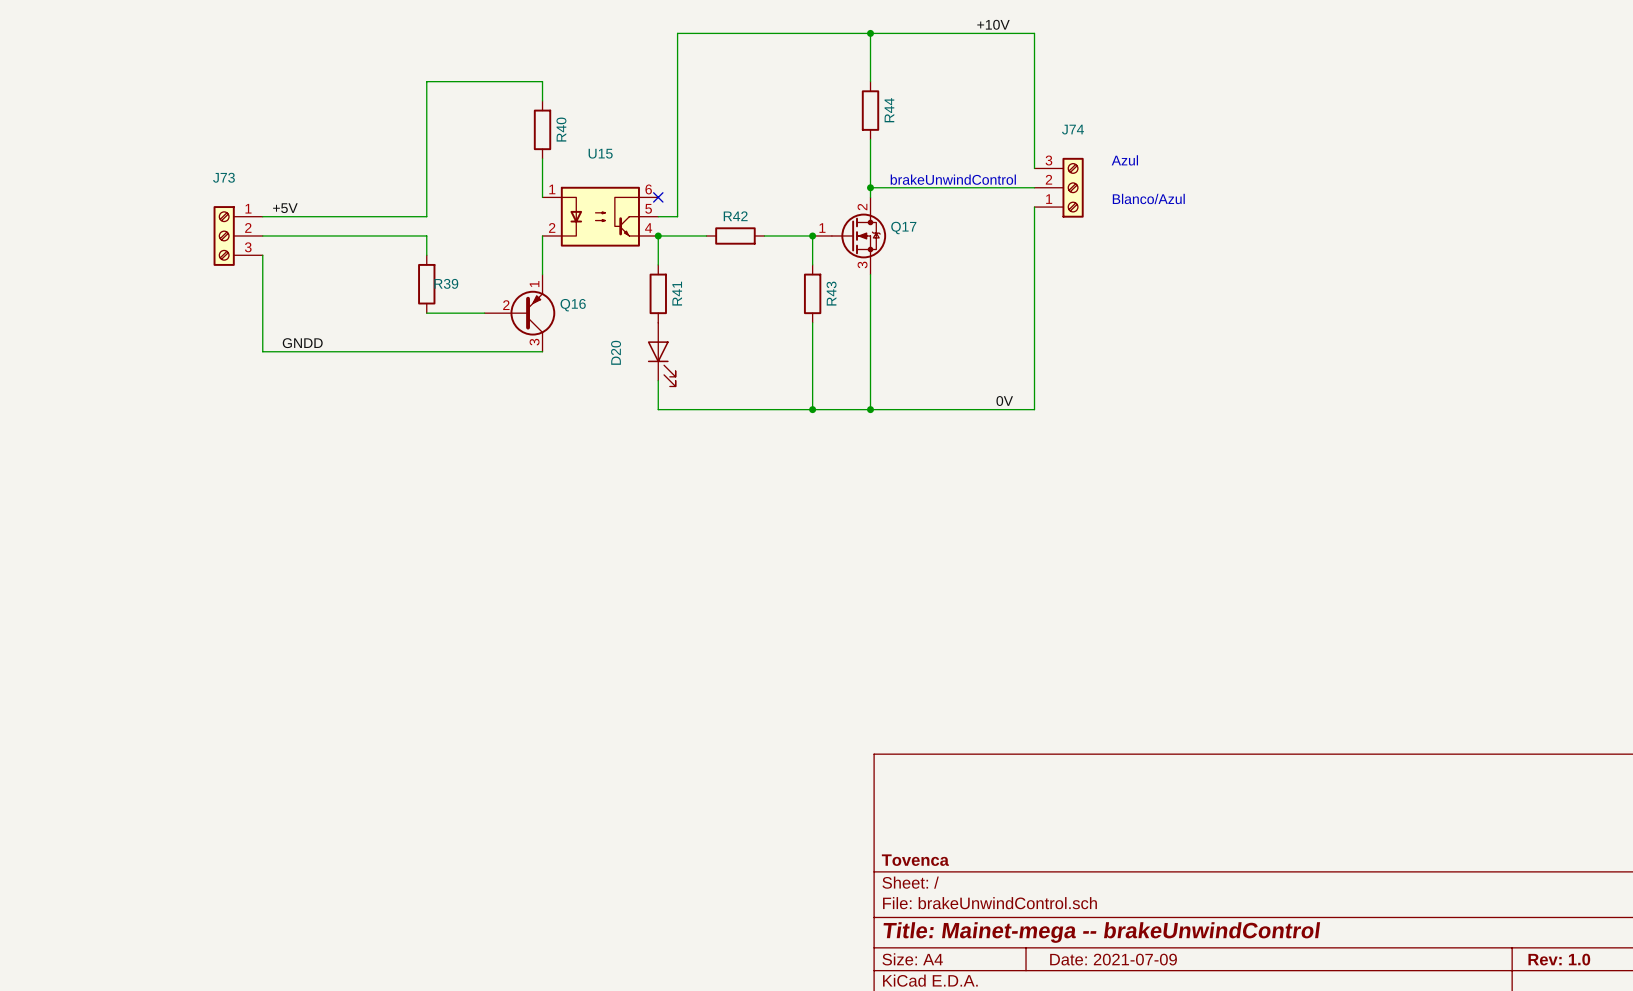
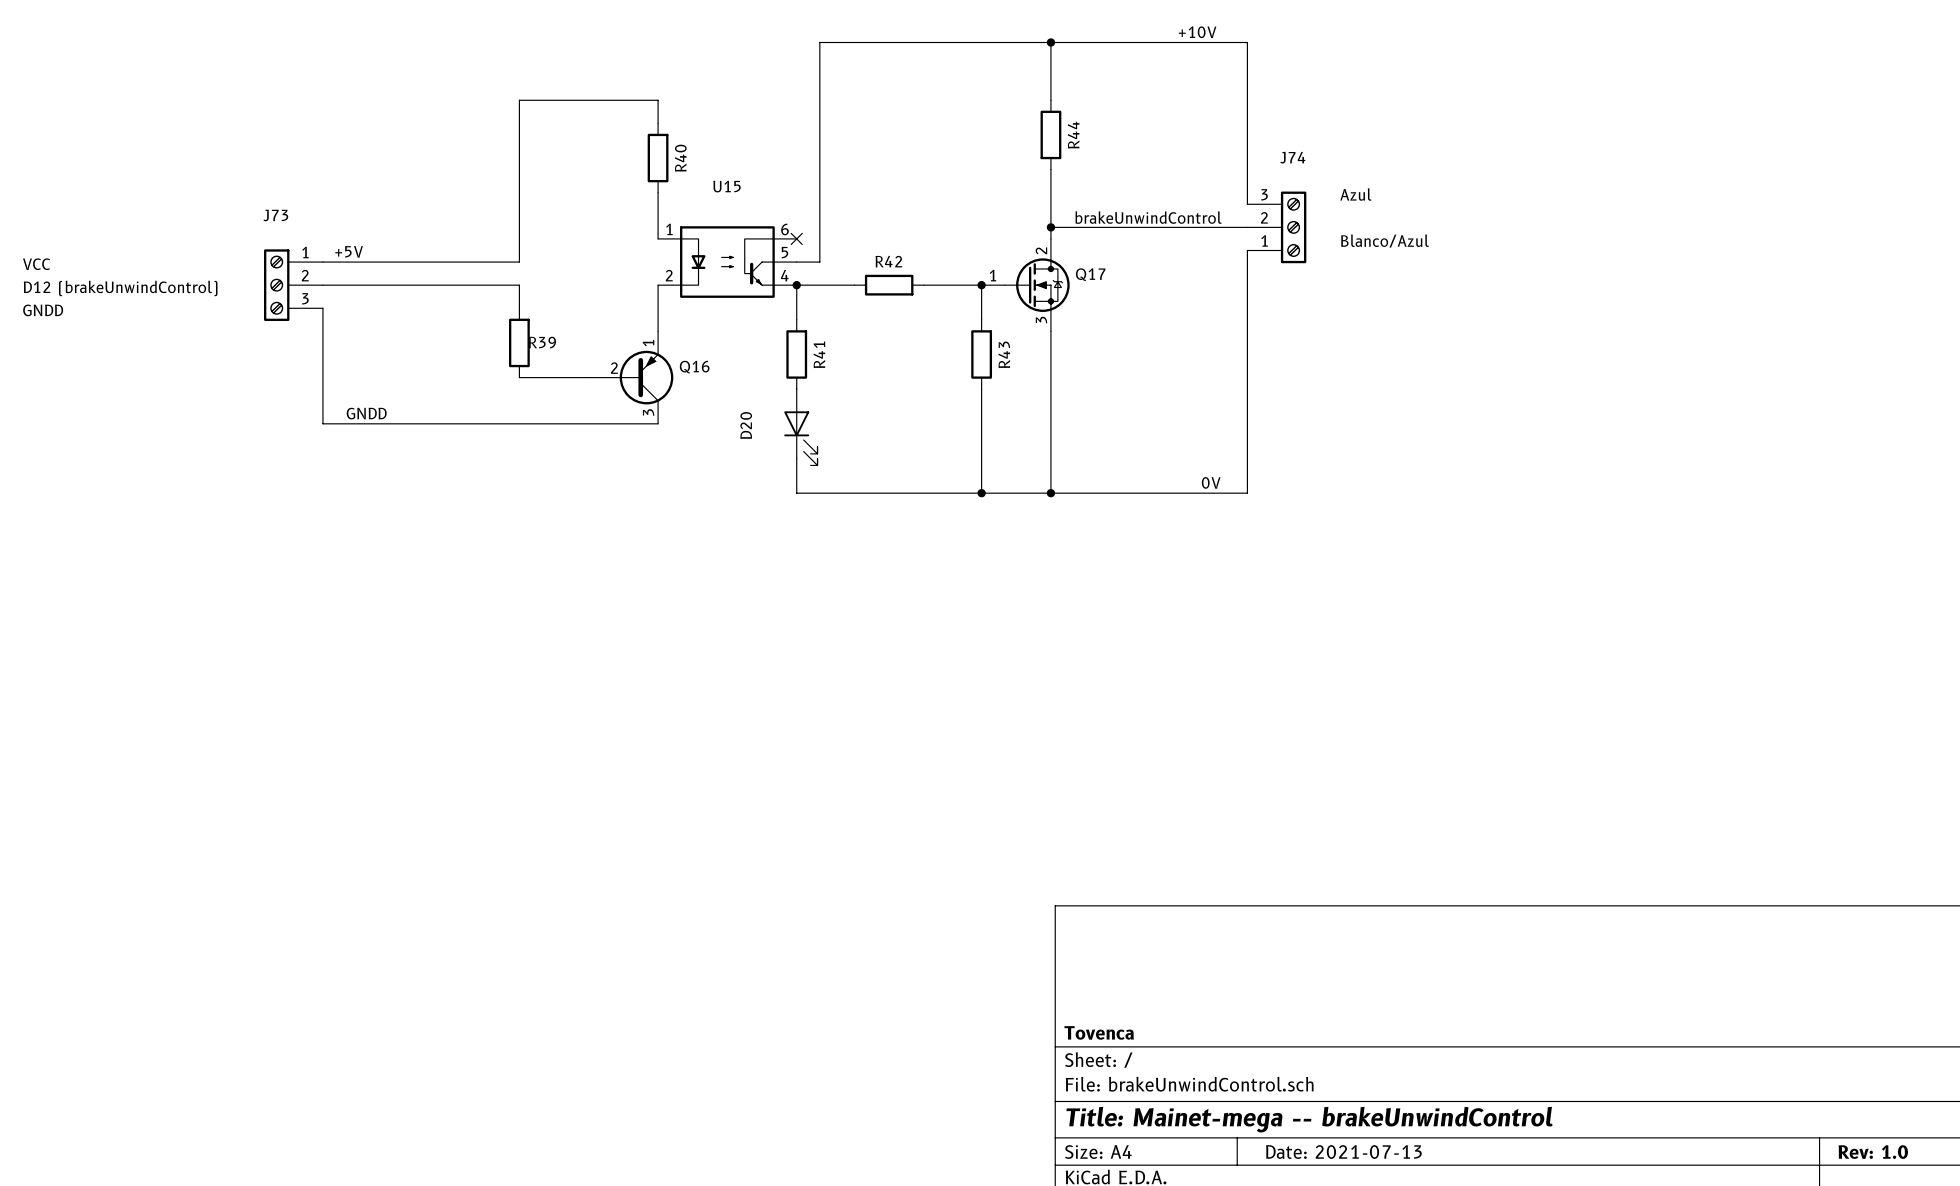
text: none -> VCC (36, 264)
text: none -> D12 (brakeUnwindControl) (120, 288)
text: none -> GNDD (43, 310)
title block: Date: 2021-07-09 (1113, 959) -> Date: 2021-07-13 (1343, 1152)

